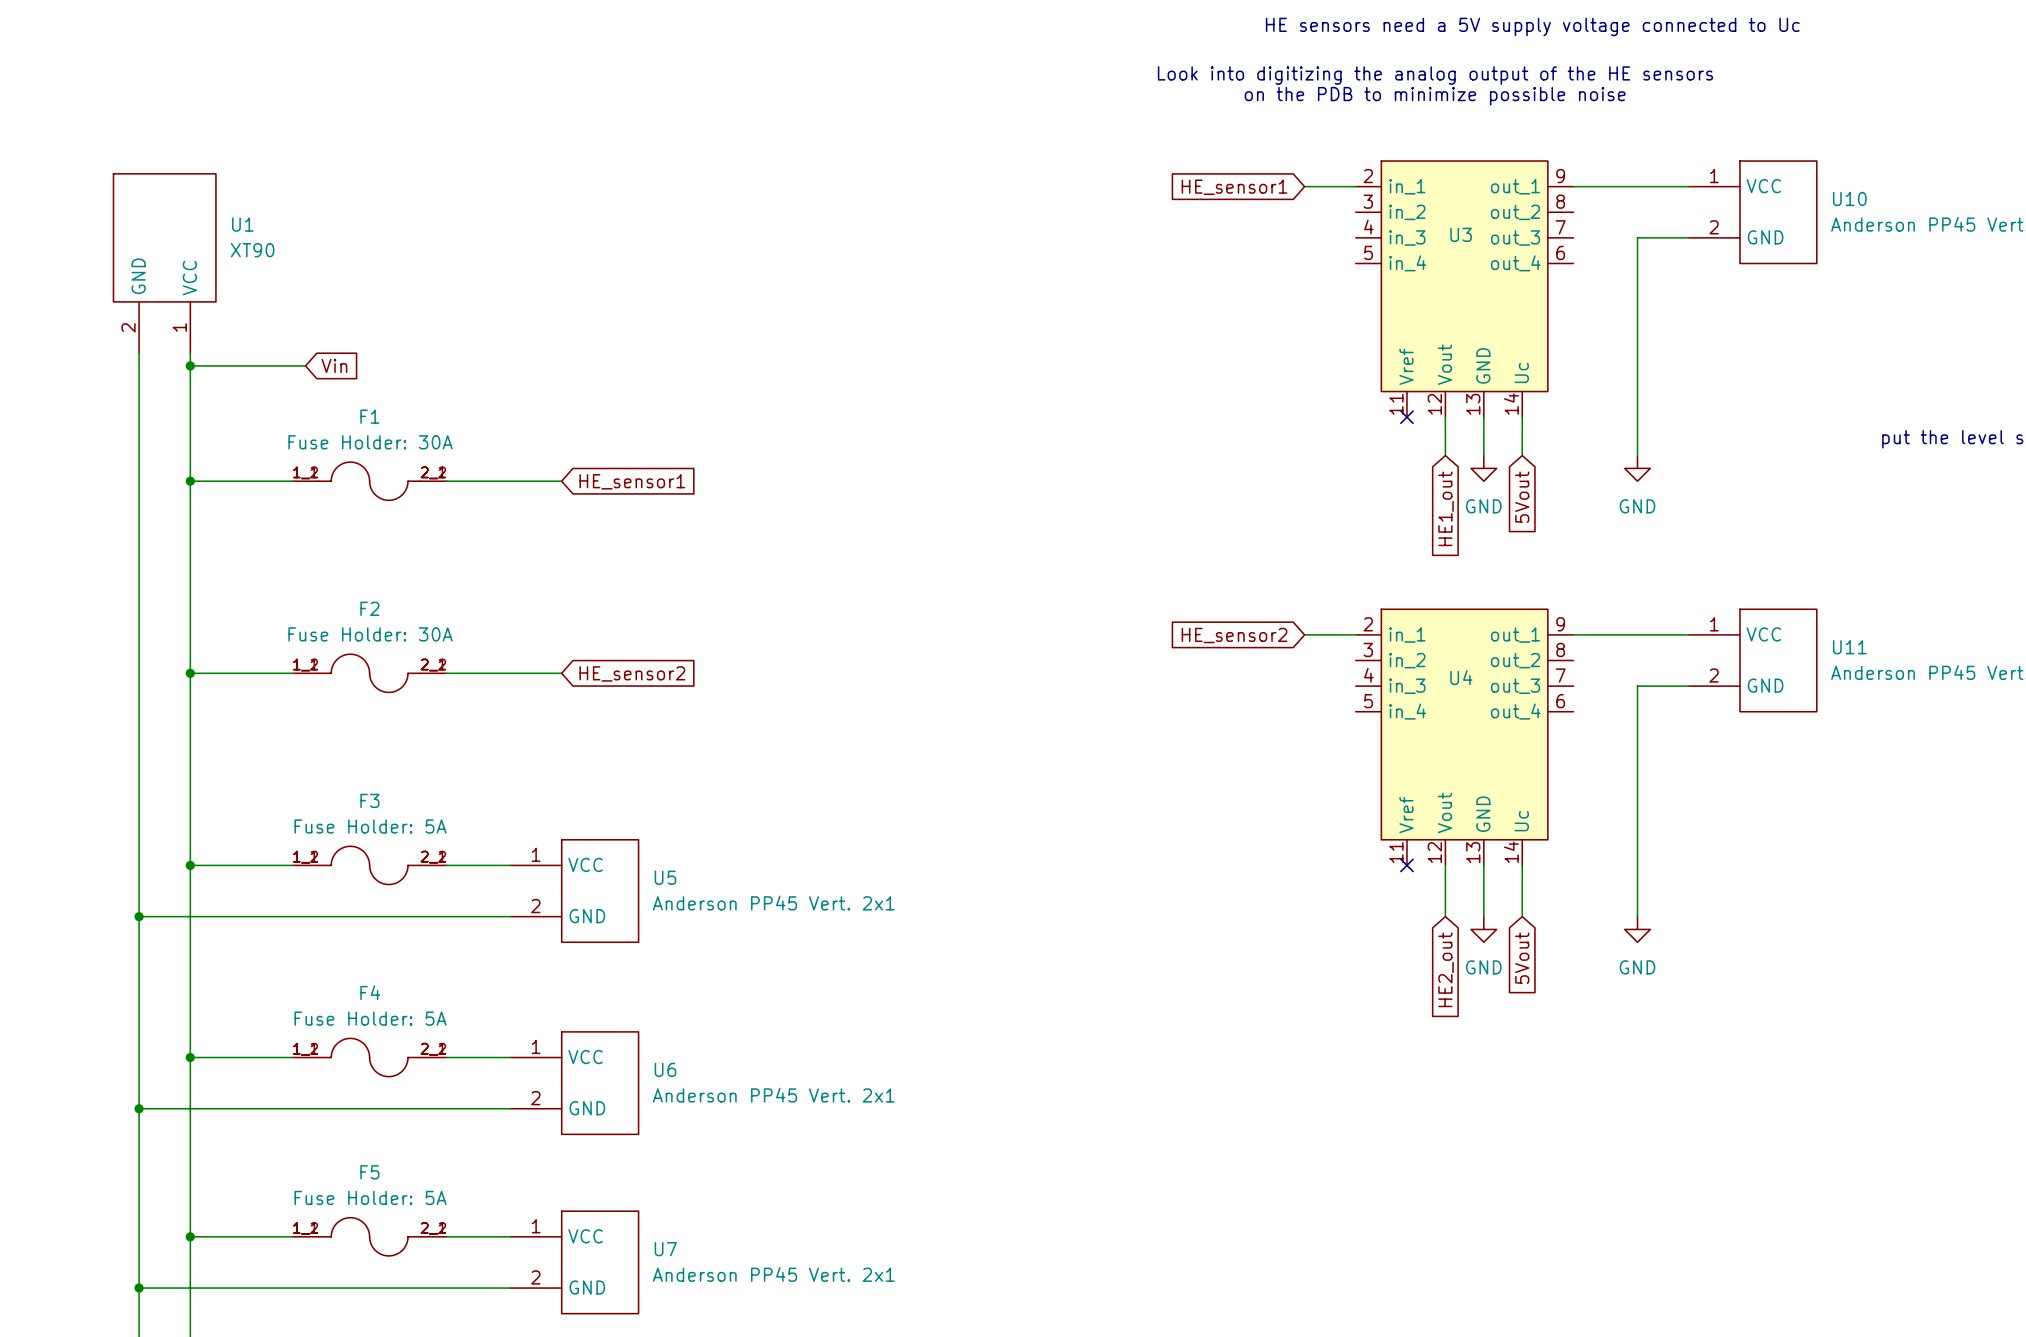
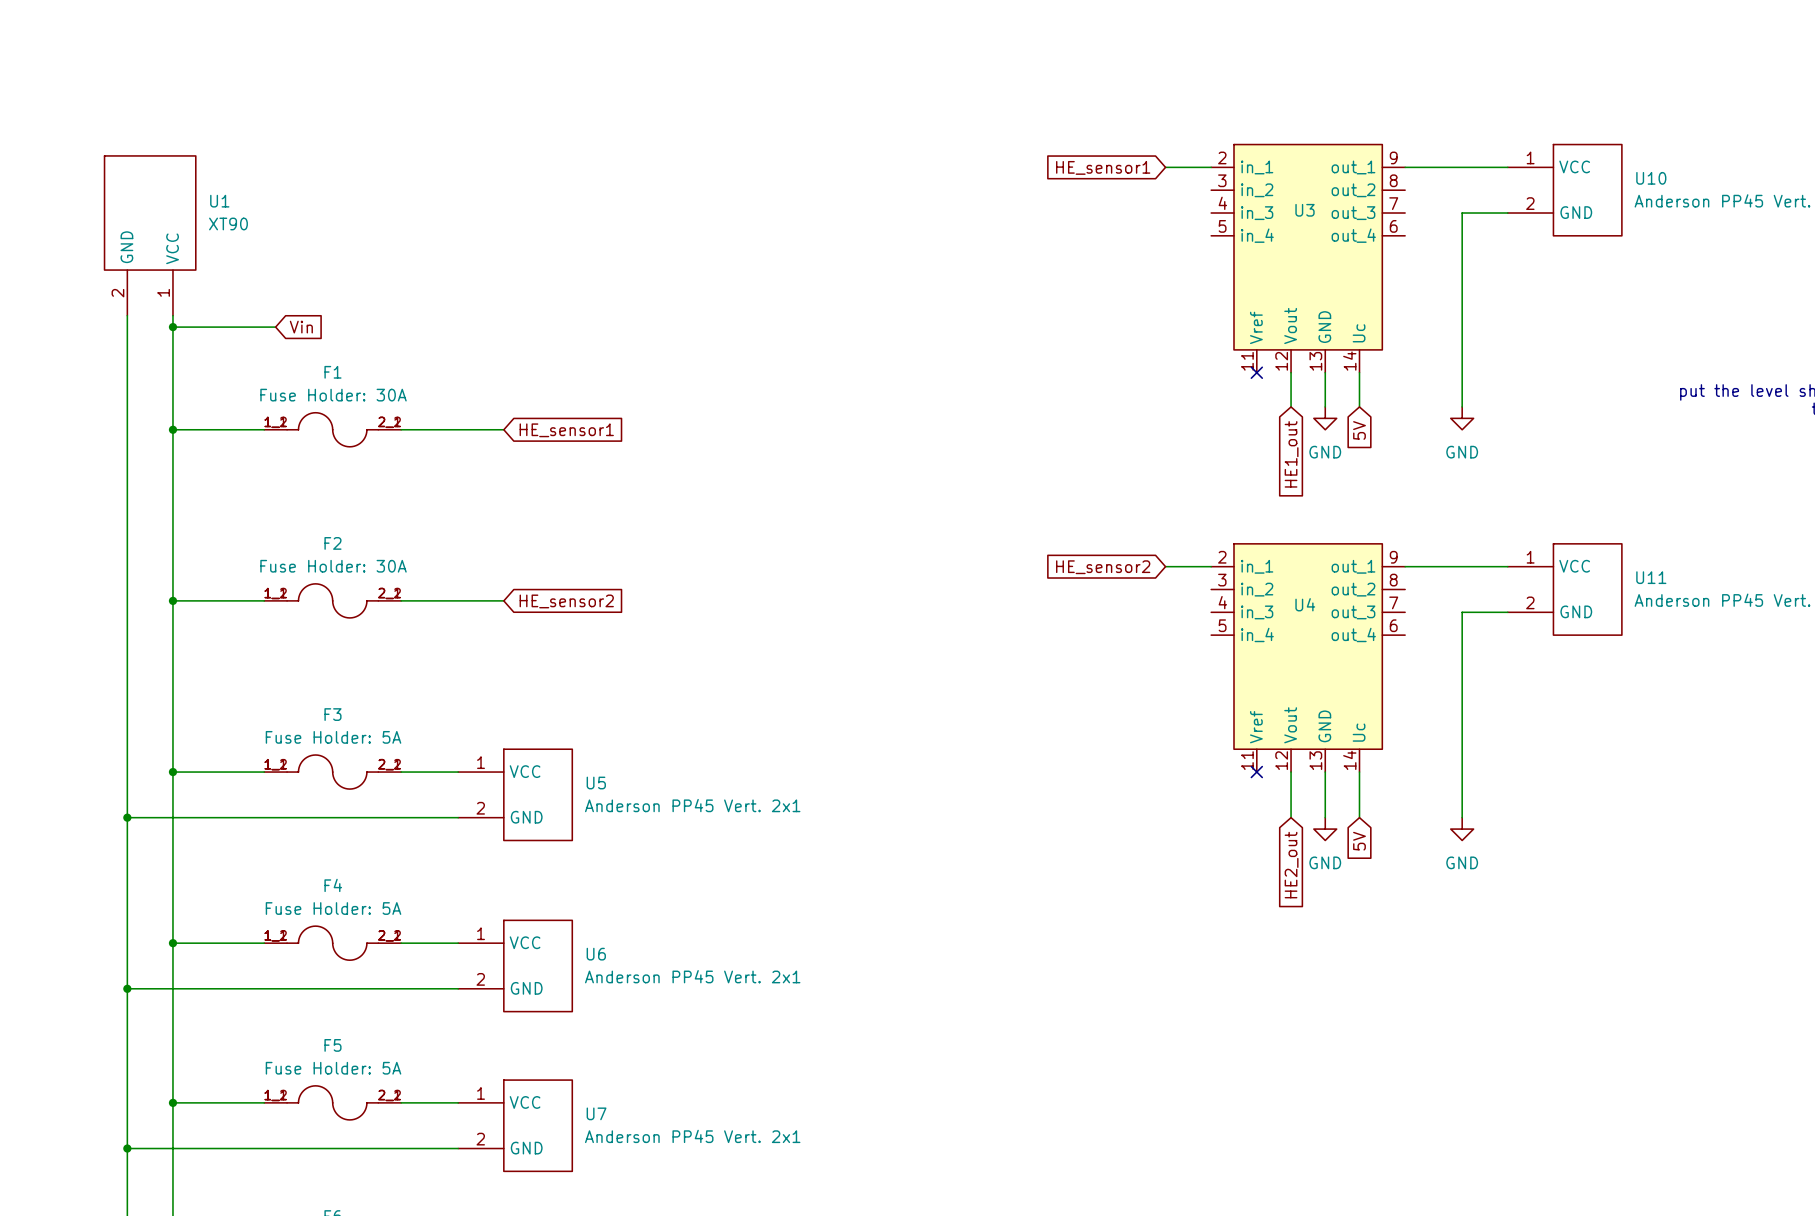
text: HE sensors need a 5V supply voltage connected to Uc (1532, 26) -> none
text: Look into digitizing the analog output of the HE sensors (1435, 75) -> none
text: on the PDB to minimize possible noise (1435, 96) -> none
global label: 5Vout (1522, 497) -> 5V (1359, 430)
global label: 5Vout (1522, 958) -> 5V (1359, 841)

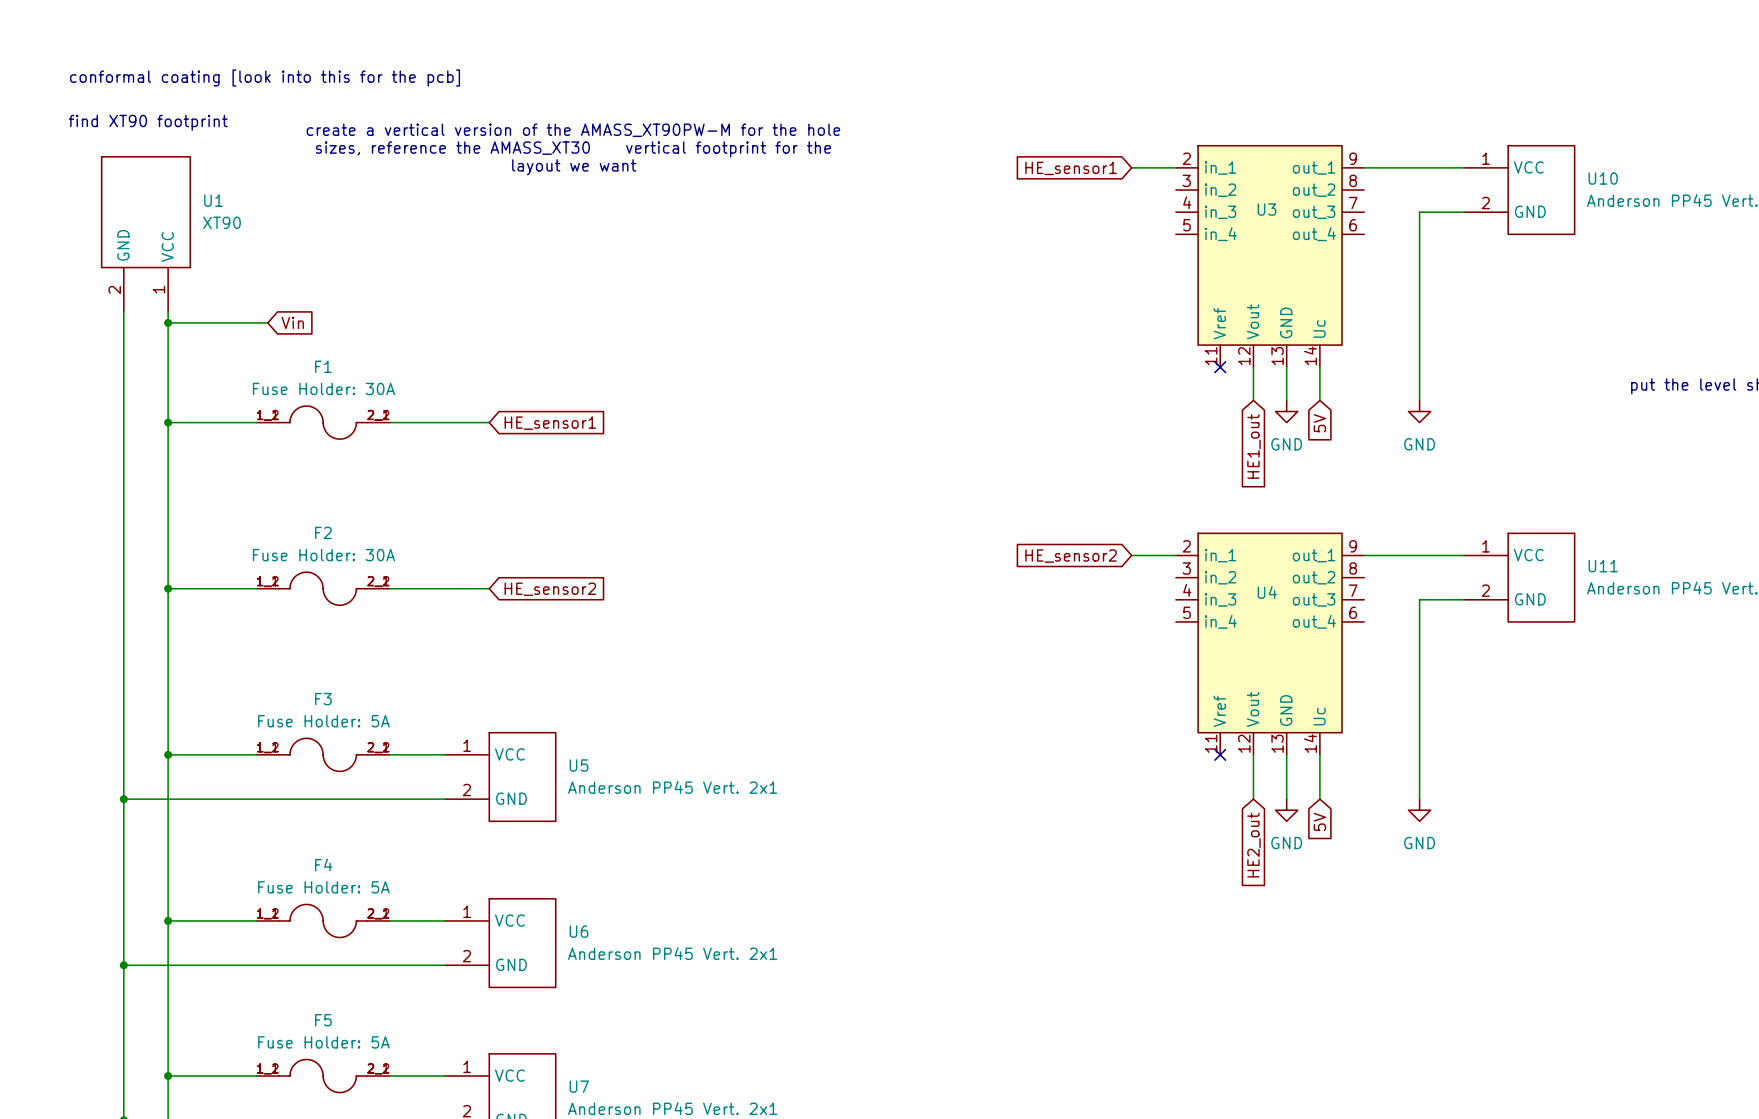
text: none -> conformal coating [look into this for the pcb] (265, 78)
text: none -> find XT90 footprint (148, 122)
text: none -> create a vertical version of the AMASS_XT90PW-M for the hole (573, 130)
text: none -> sizes, reference the AMASS_XT30 vertical footprint for the (573, 149)
text: none -> layout we want (574, 167)

